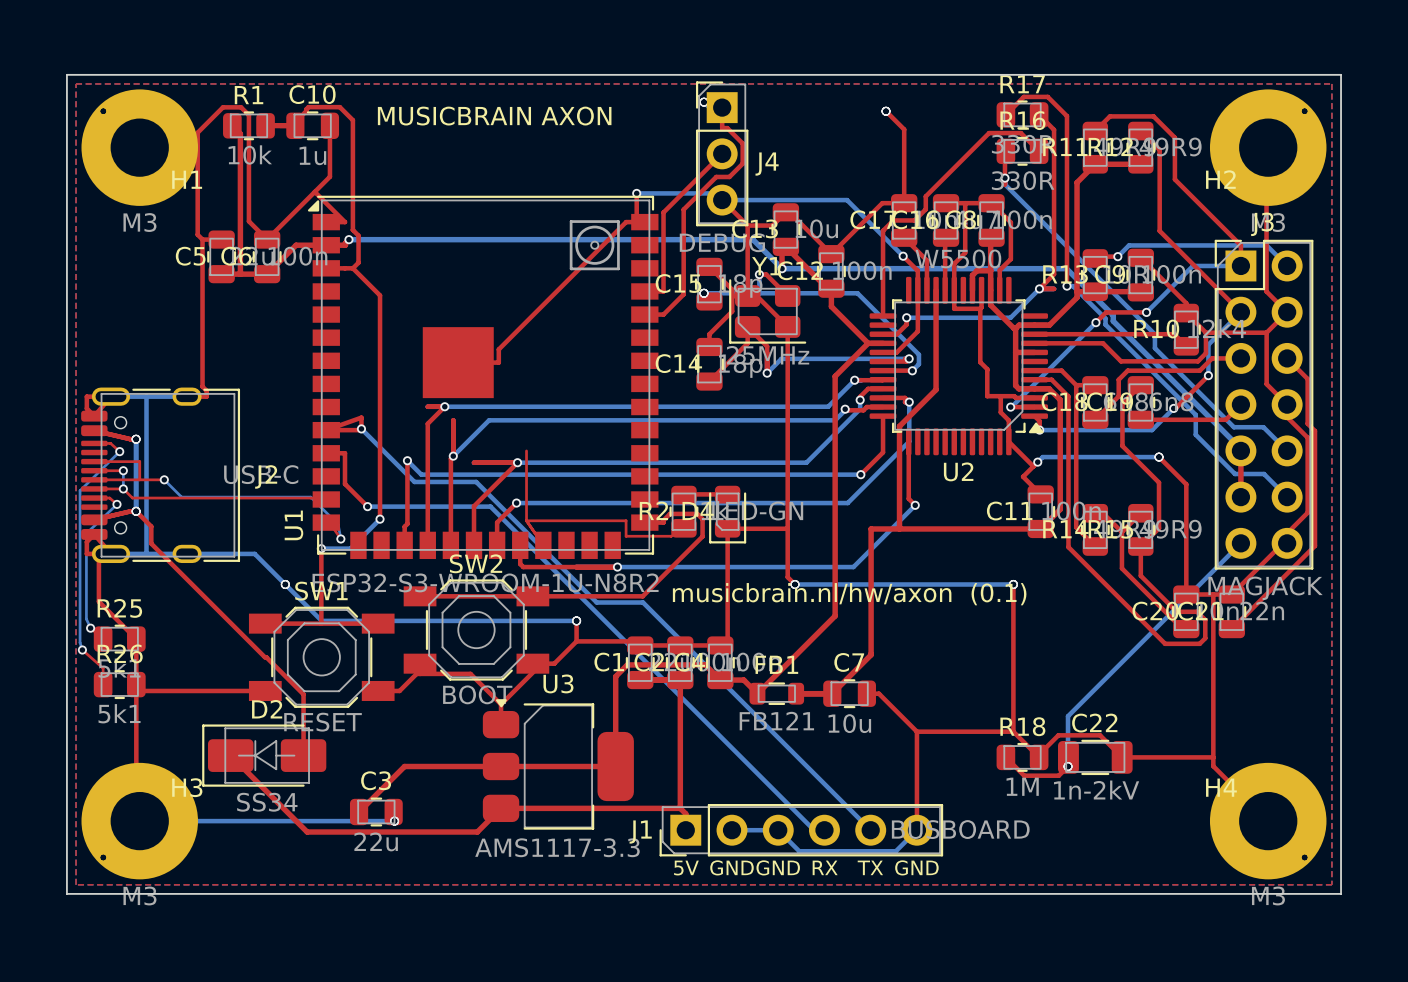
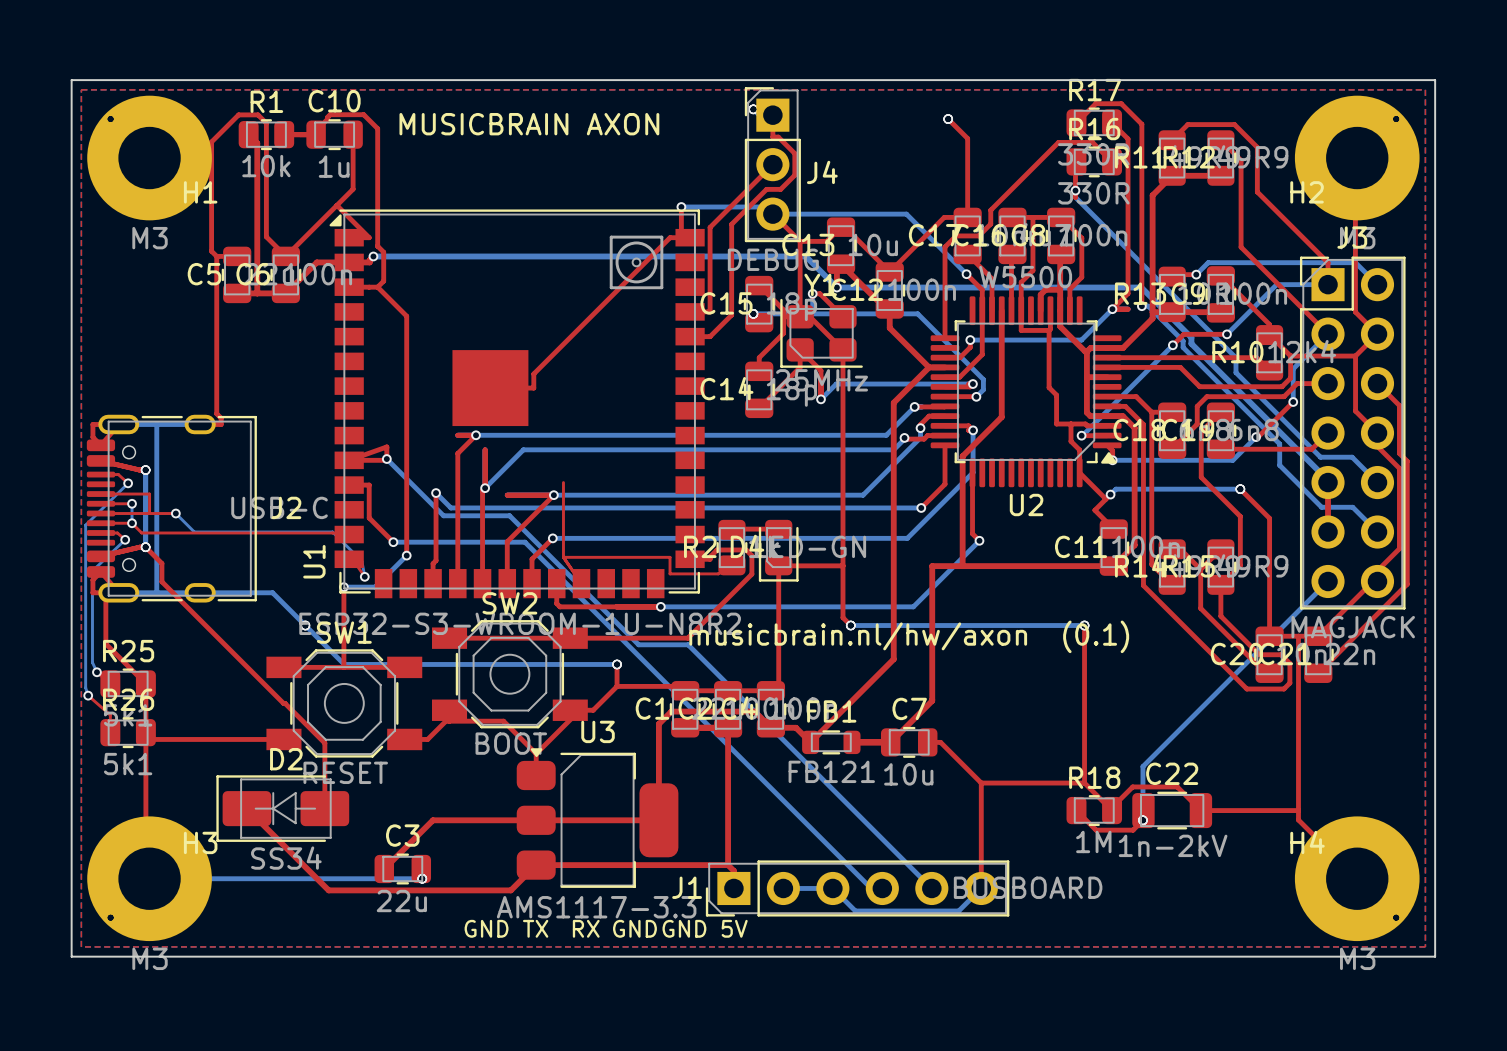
text: none -> GND (486, 928)
text: none -> GND (634, 928)
text: none -> GND (684, 928)
text: GND (731, 867) -> none
text: GND (778, 867) -> none
text position: RX (825, 867) -> RX (586, 928)
text position: TX (870, 867) -> TX (535, 928)
text: GND (916, 867) -> none

